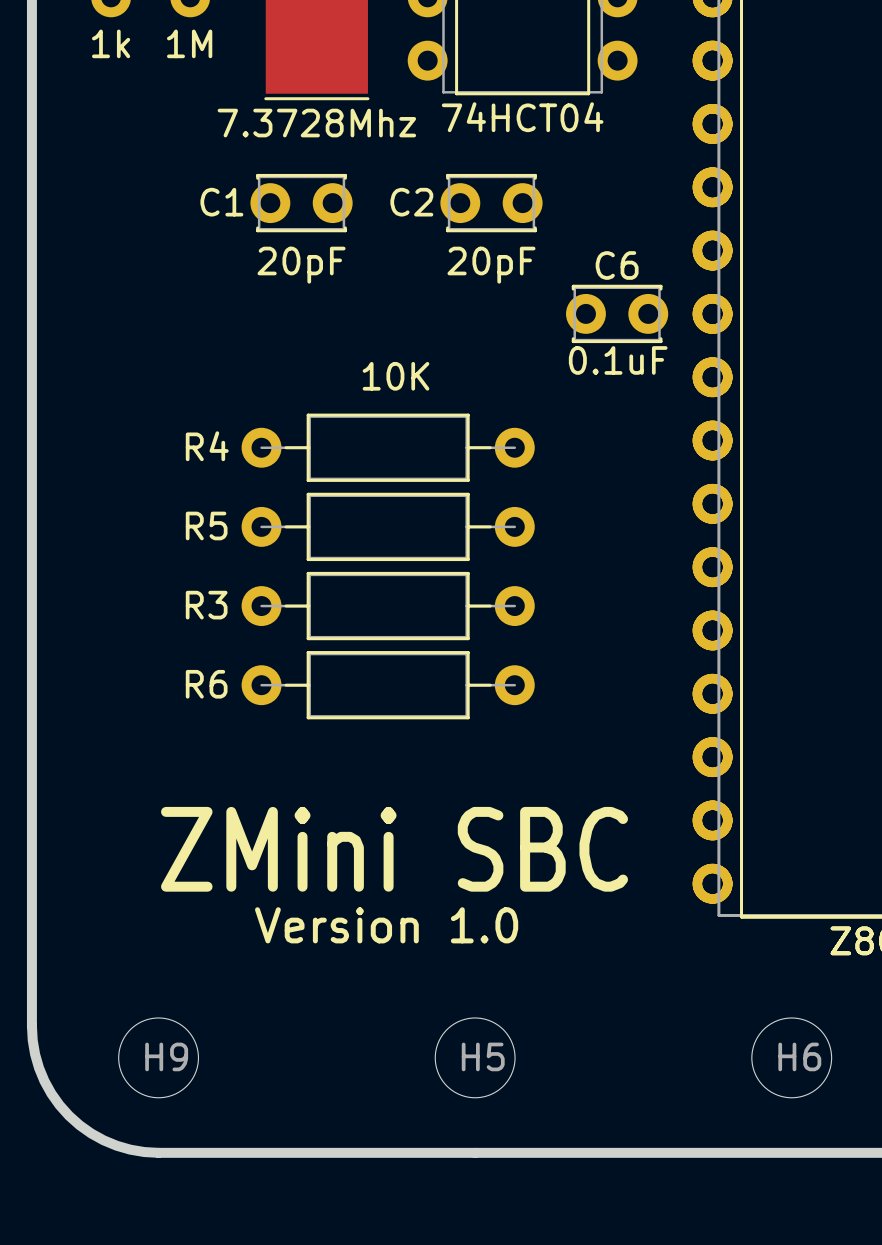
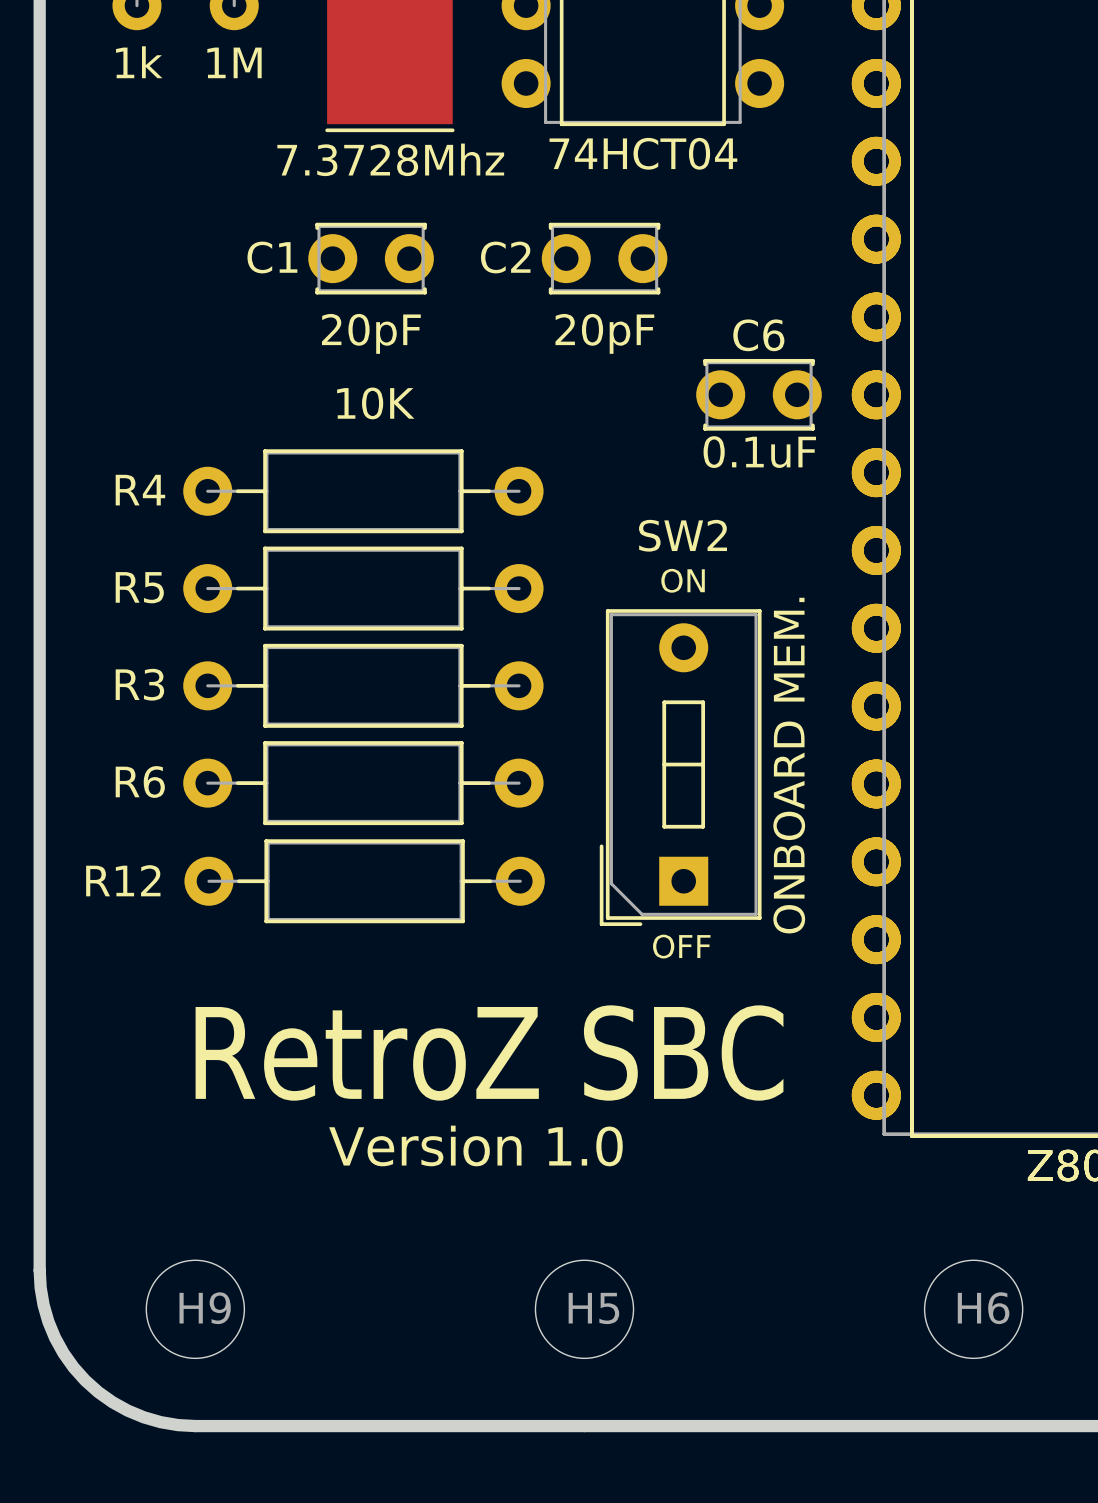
R4 position: (388, 447) -> (363, 491)
text: none -> ON (683, 580)
R5 position: (388, 526) -> (363, 588)
R3 position: (388, 606) -> (363, 685)
SW2: none -> ONBOARD MEM. (680, 767)
R6 position: (388, 685) -> (363, 783)
R12: none -> (364, 881)
text: none -> OFF (681, 946)
text: ZMini SBC (394, 849) -> RetroZ SBC (489, 1053)

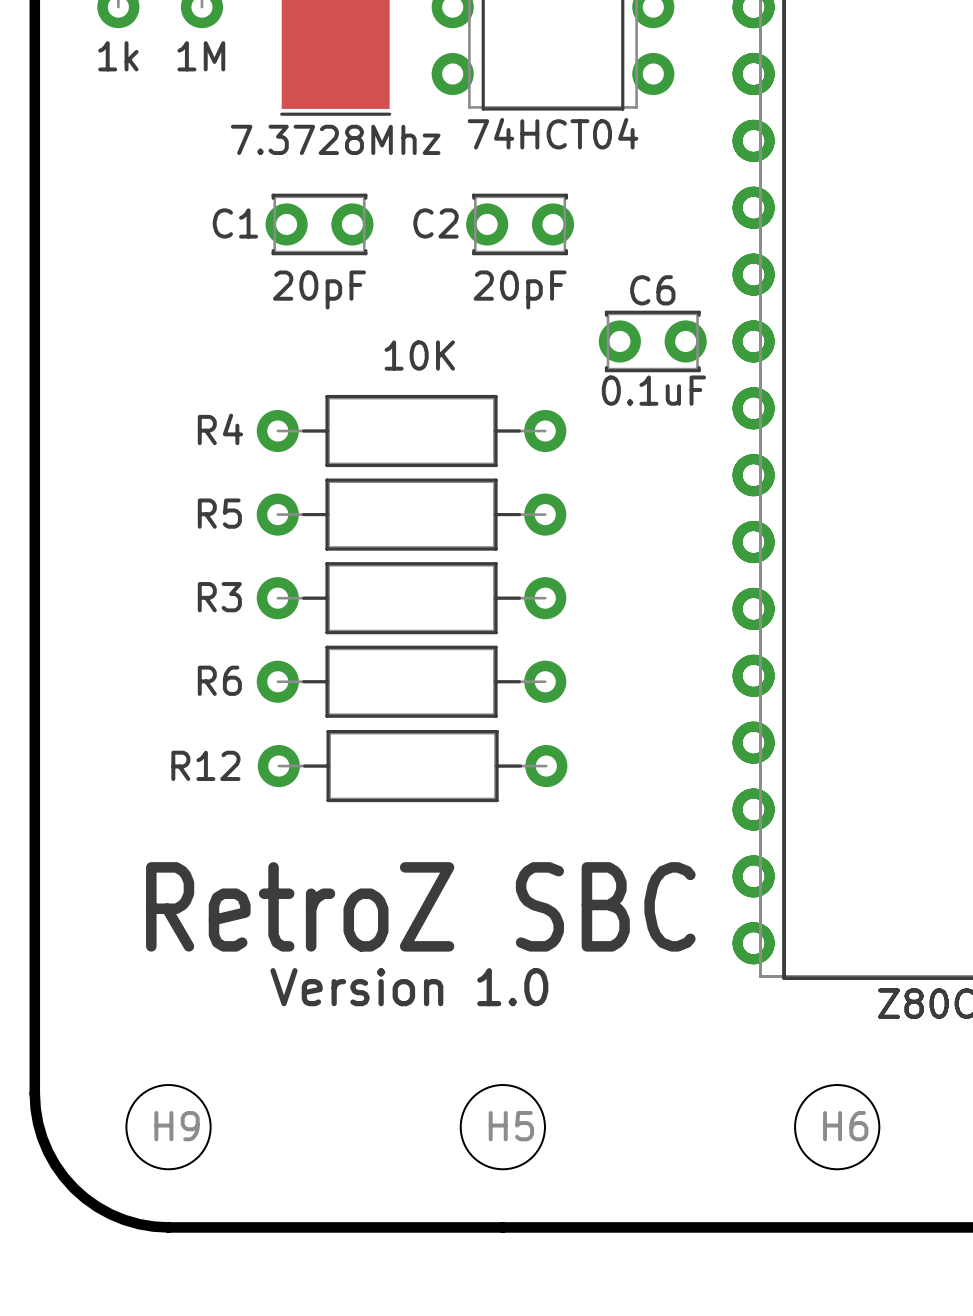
R4 position: (363, 491) -> (411, 431)
text: ON (683, 580) -> none
R5 position: (363, 588) -> (411, 514)
R3 position: (363, 685) -> (411, 598)
SW2: ONBOARD MEM. (680, 767) -> none
R6 position: (363, 783) -> (411, 681)
R12 position: (364, 881) -> (412, 766)
text: OFF (681, 946) -> none

